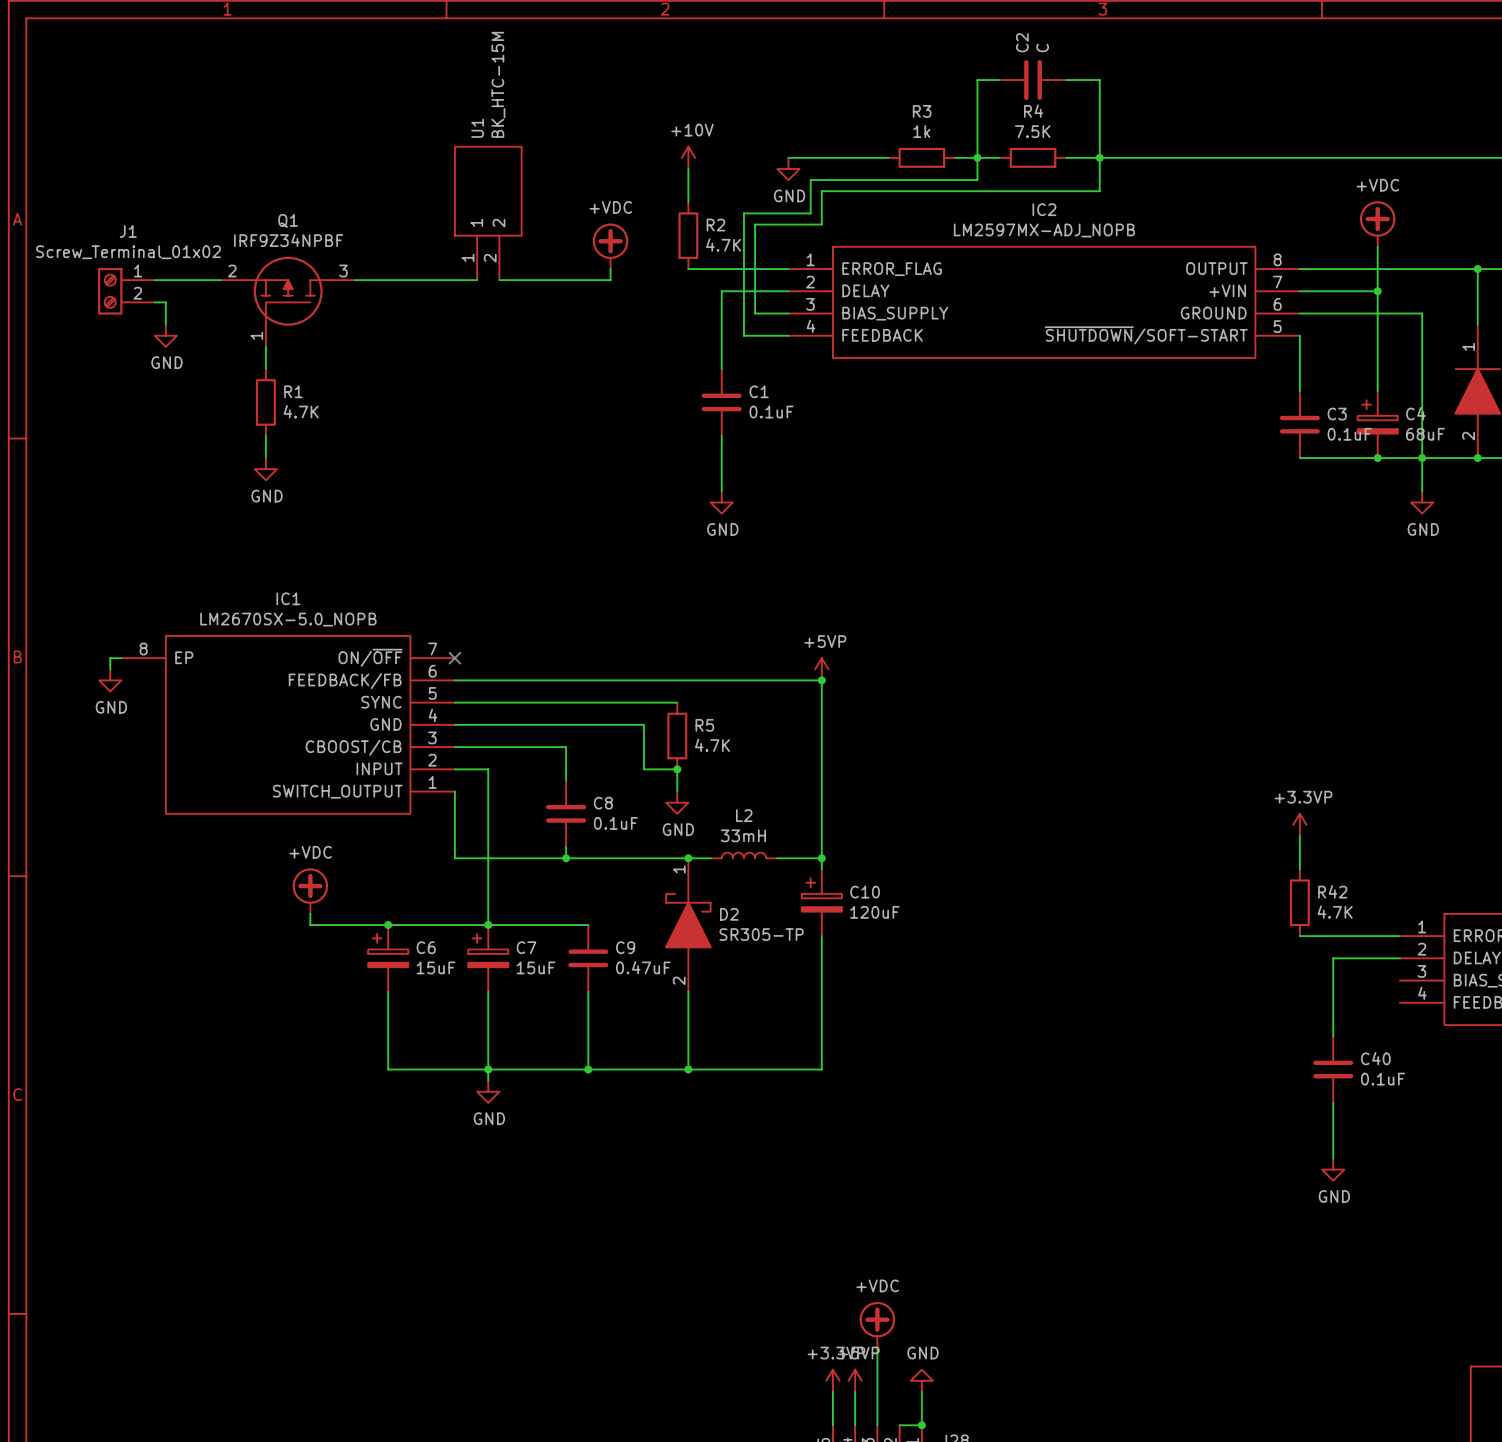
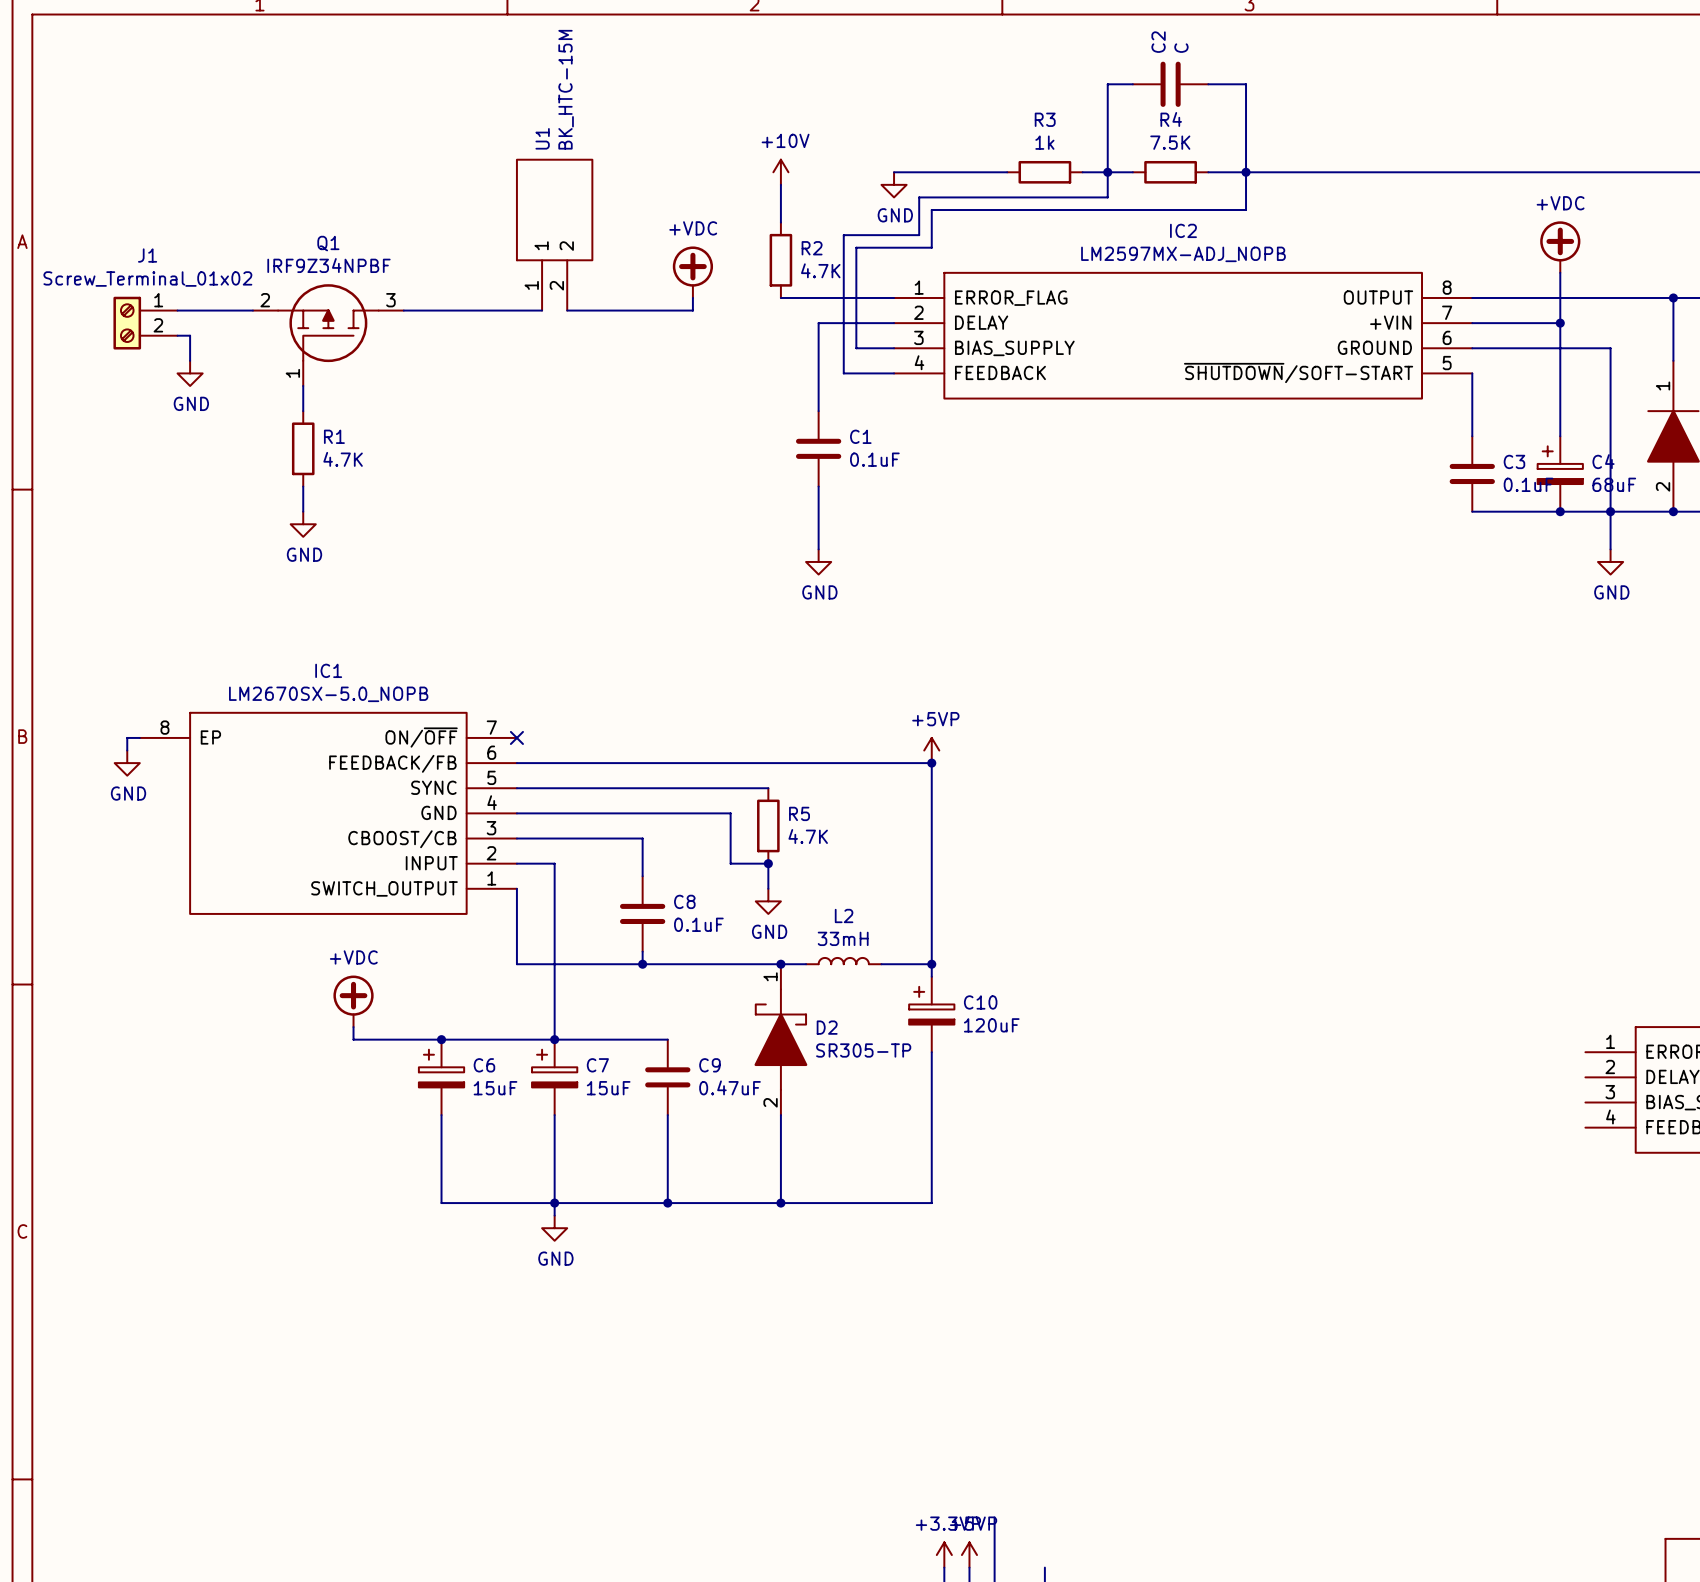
power symbol: +3.3VP (1299, 824) -> none
wire: (1299, 836) (1299, 869) -> none
R42: 4.7K (1299, 902) -> none
wire: (1299, 936) (1399, 936) -> none
wire: (1399, 958) (1333, 958) (1333, 1036) -> none
C40: 0.1uF (1333, 1069) -> none
wire: (1333, 1102) (1333, 1158) -> none
power symbol: GND (1333, 1169) -> none
power symbol: +VDC (877, 1324) -> none
power symbol: GND (921, 1380) -> none

